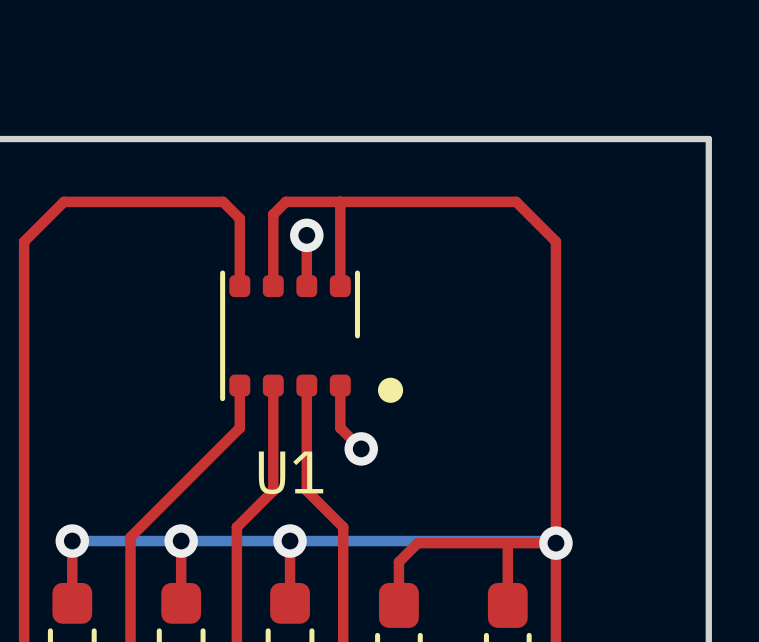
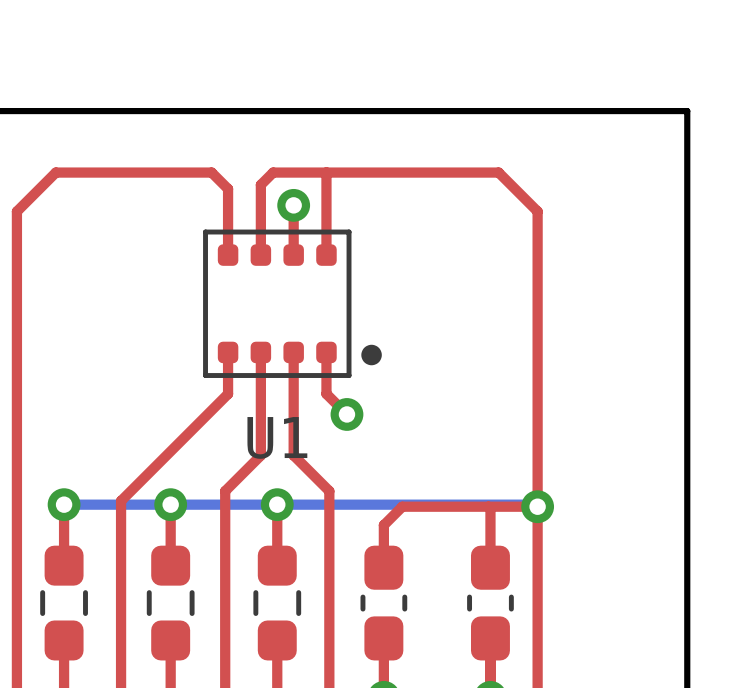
U1 footprint: [220, 270, 360, 402] -> [203, 229, 382, 378]
drawing: [377, 377, 404, 403] -> none

